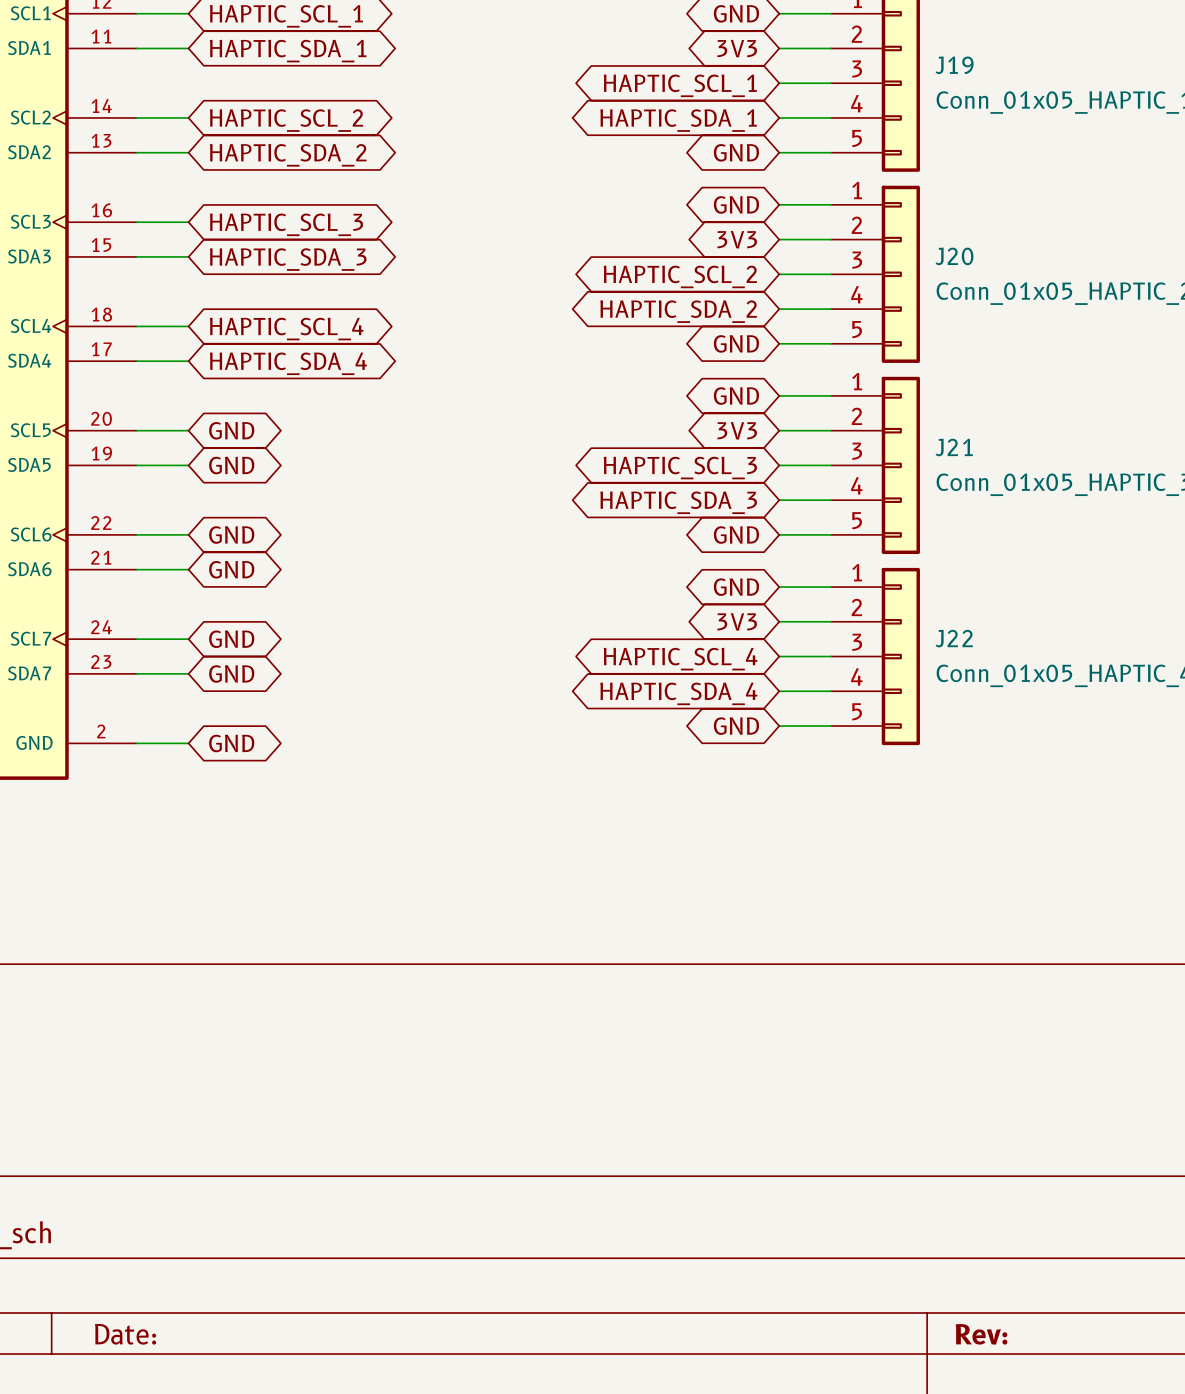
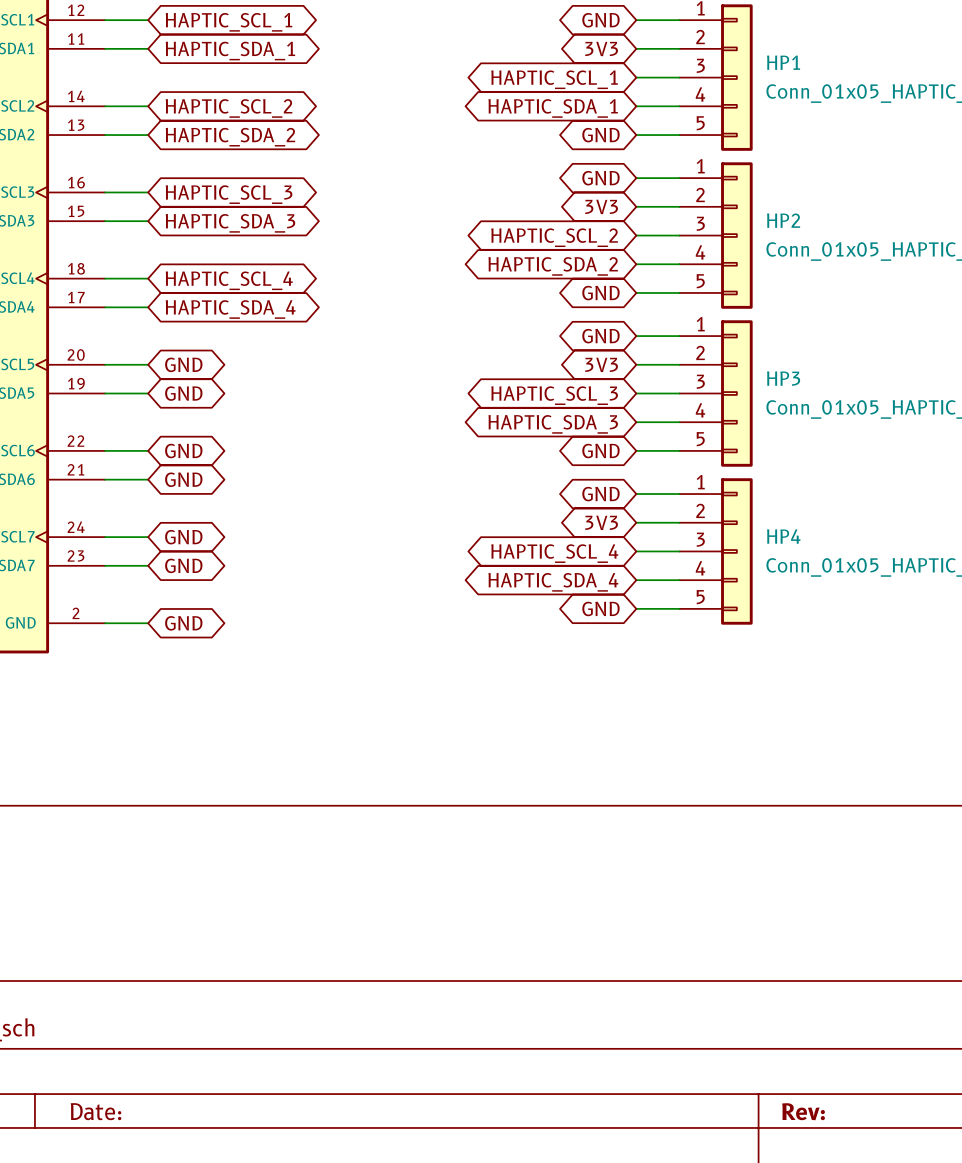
J19 name: J19 (954, 65) -> HP1 (783, 62)
J20 name: J20 (954, 256) -> HP2 (783, 220)
J21 name: J21 (954, 447) -> HP3 (783, 378)
J22 name: J22 (954, 638) -> HP4 (783, 536)

